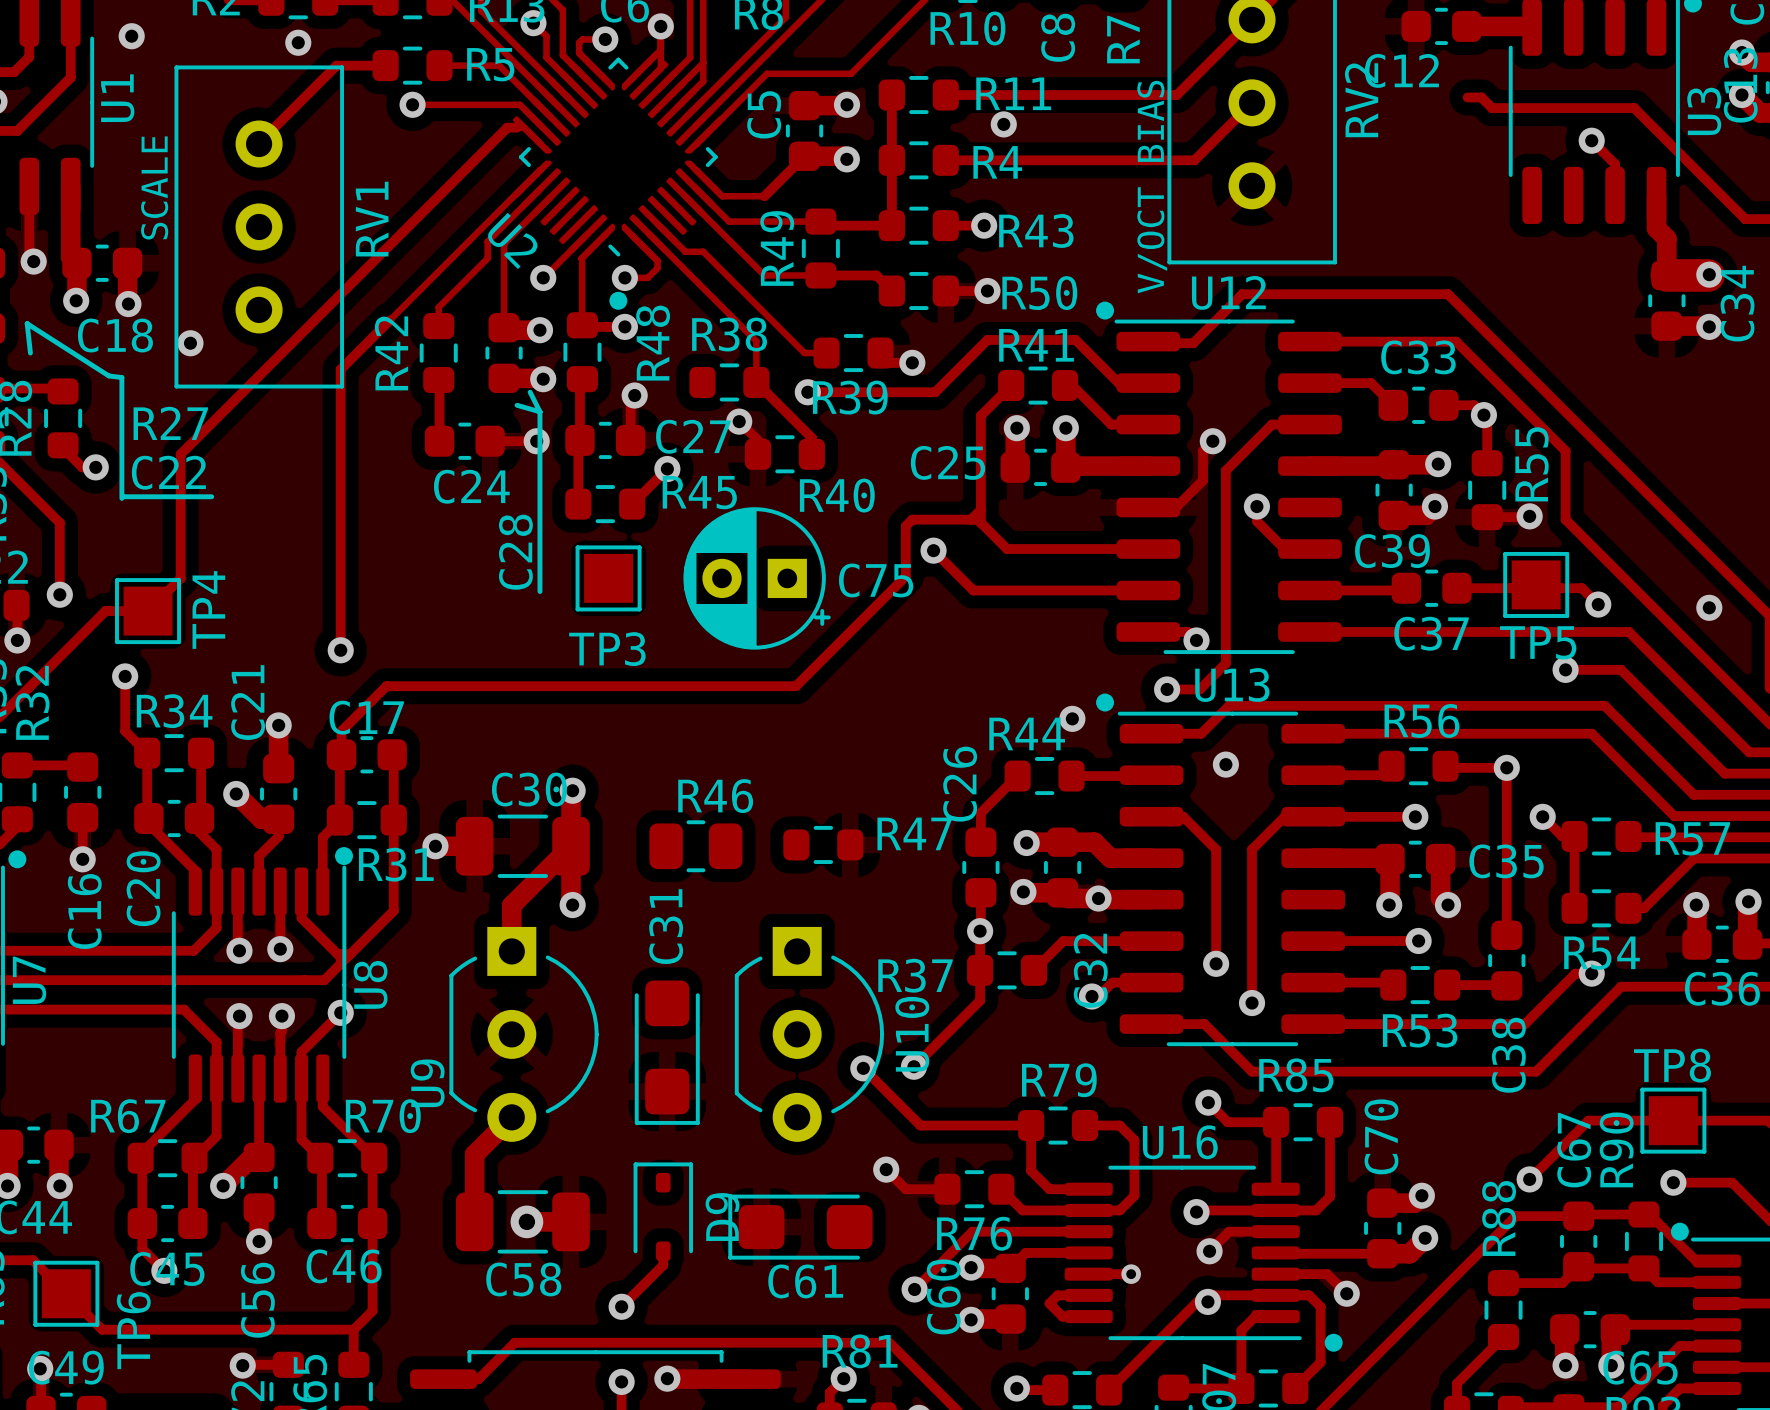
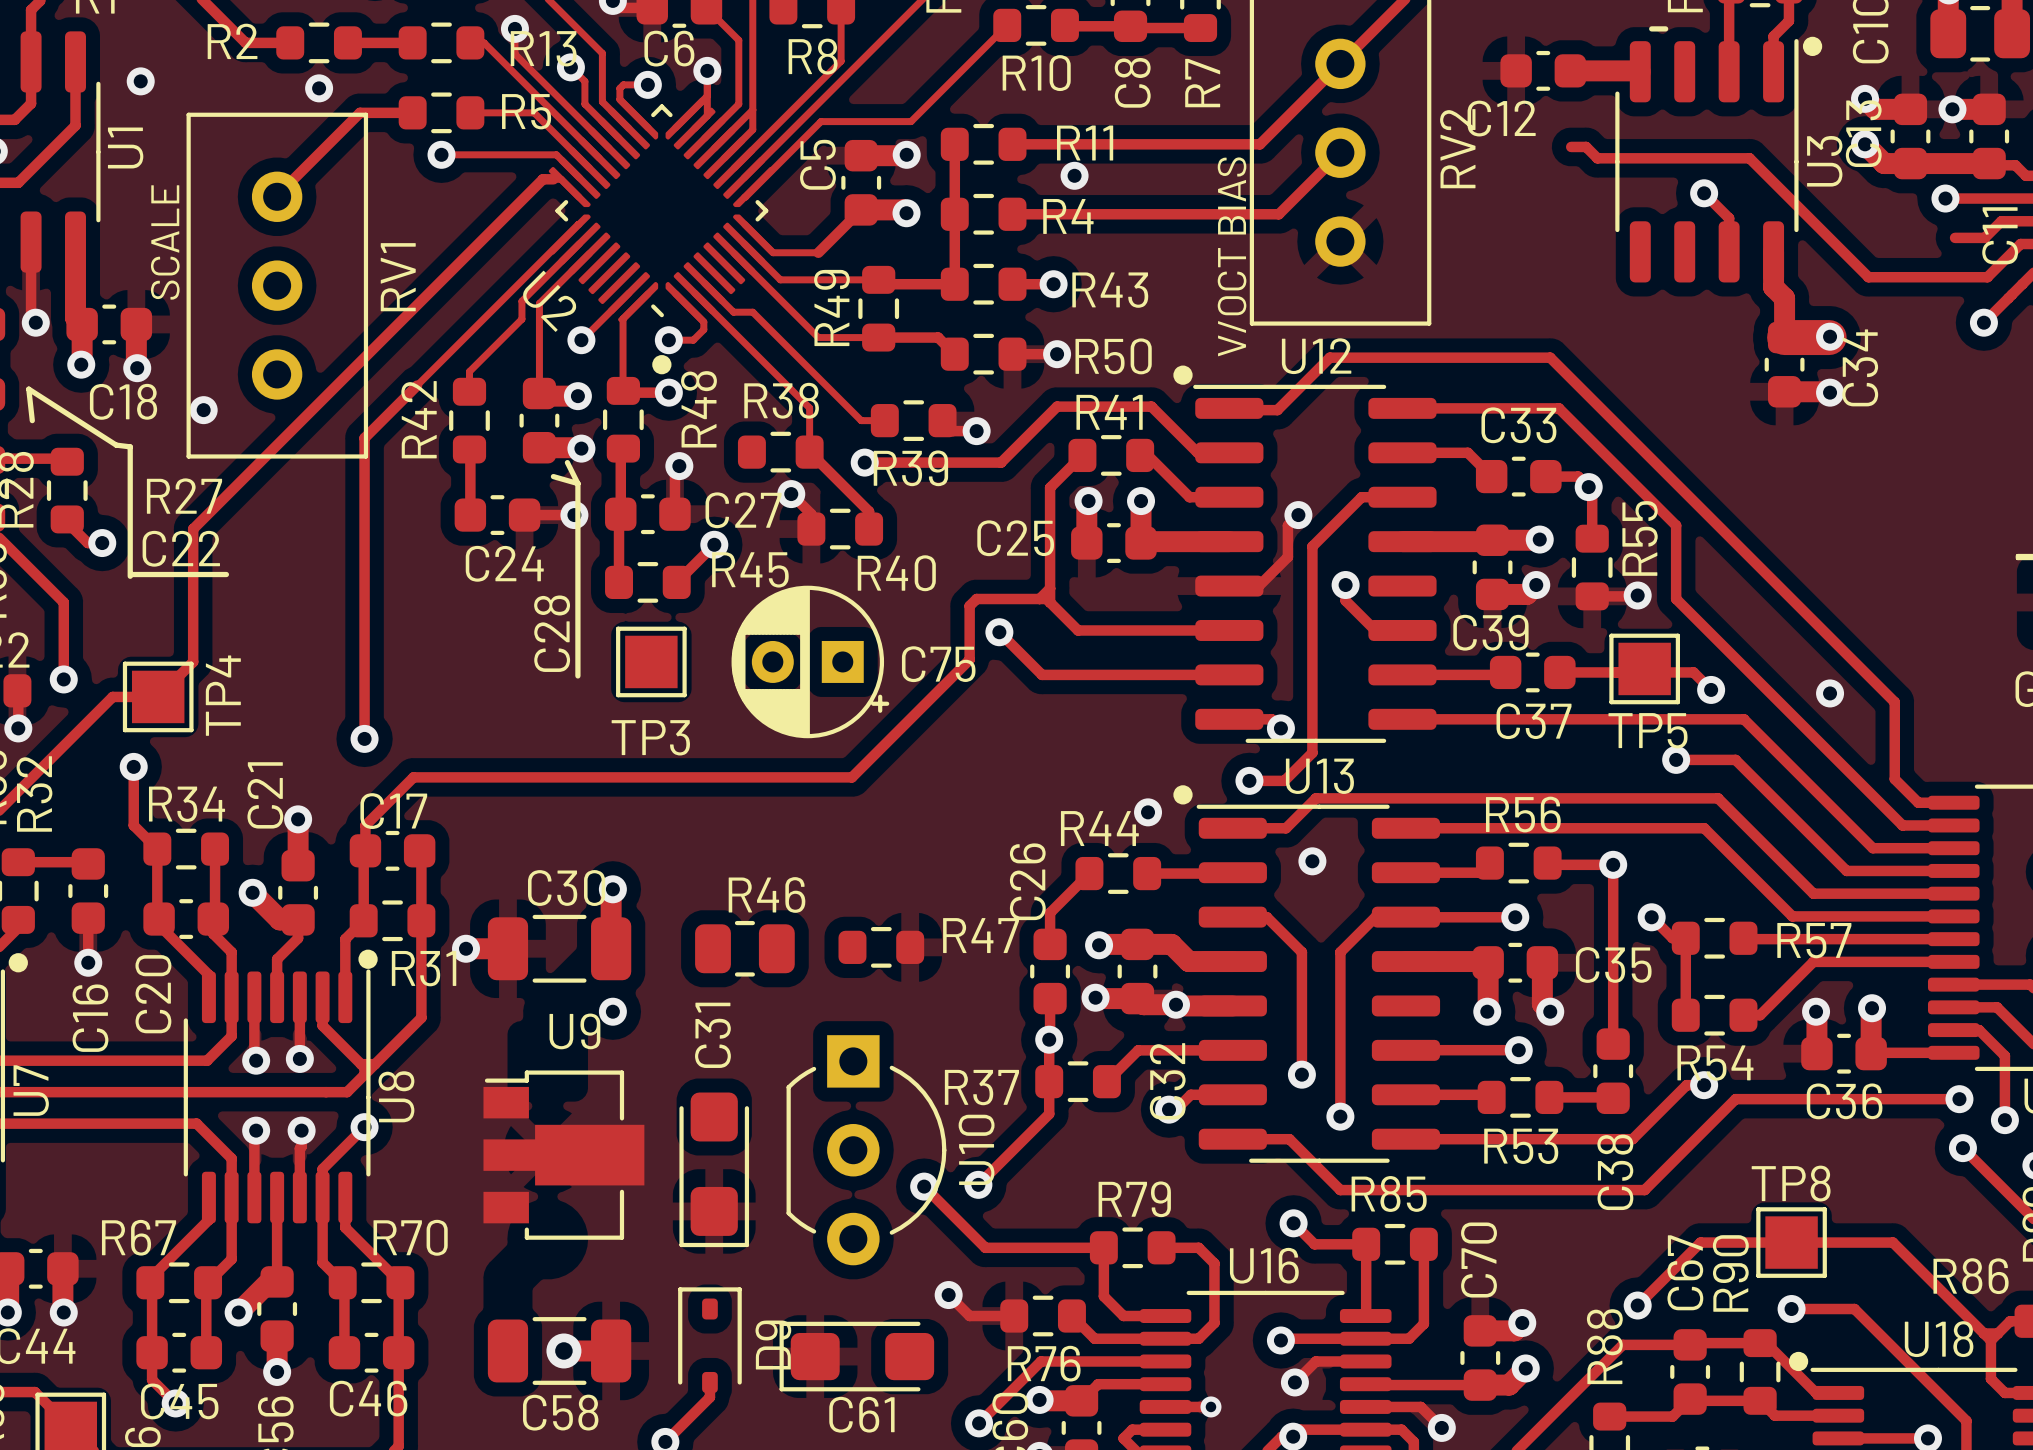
track: (571, 903) (571, 846) (511, 905) (511, 951) -> none
U9 footprint: [449, 926, 599, 1142] -> [483, 1070, 645, 1240]
U9 name position: U9 (427, 1083) -> U9 (574, 1031)
track: (511, 1117) (474, 1154) (474, 1221) -> none

